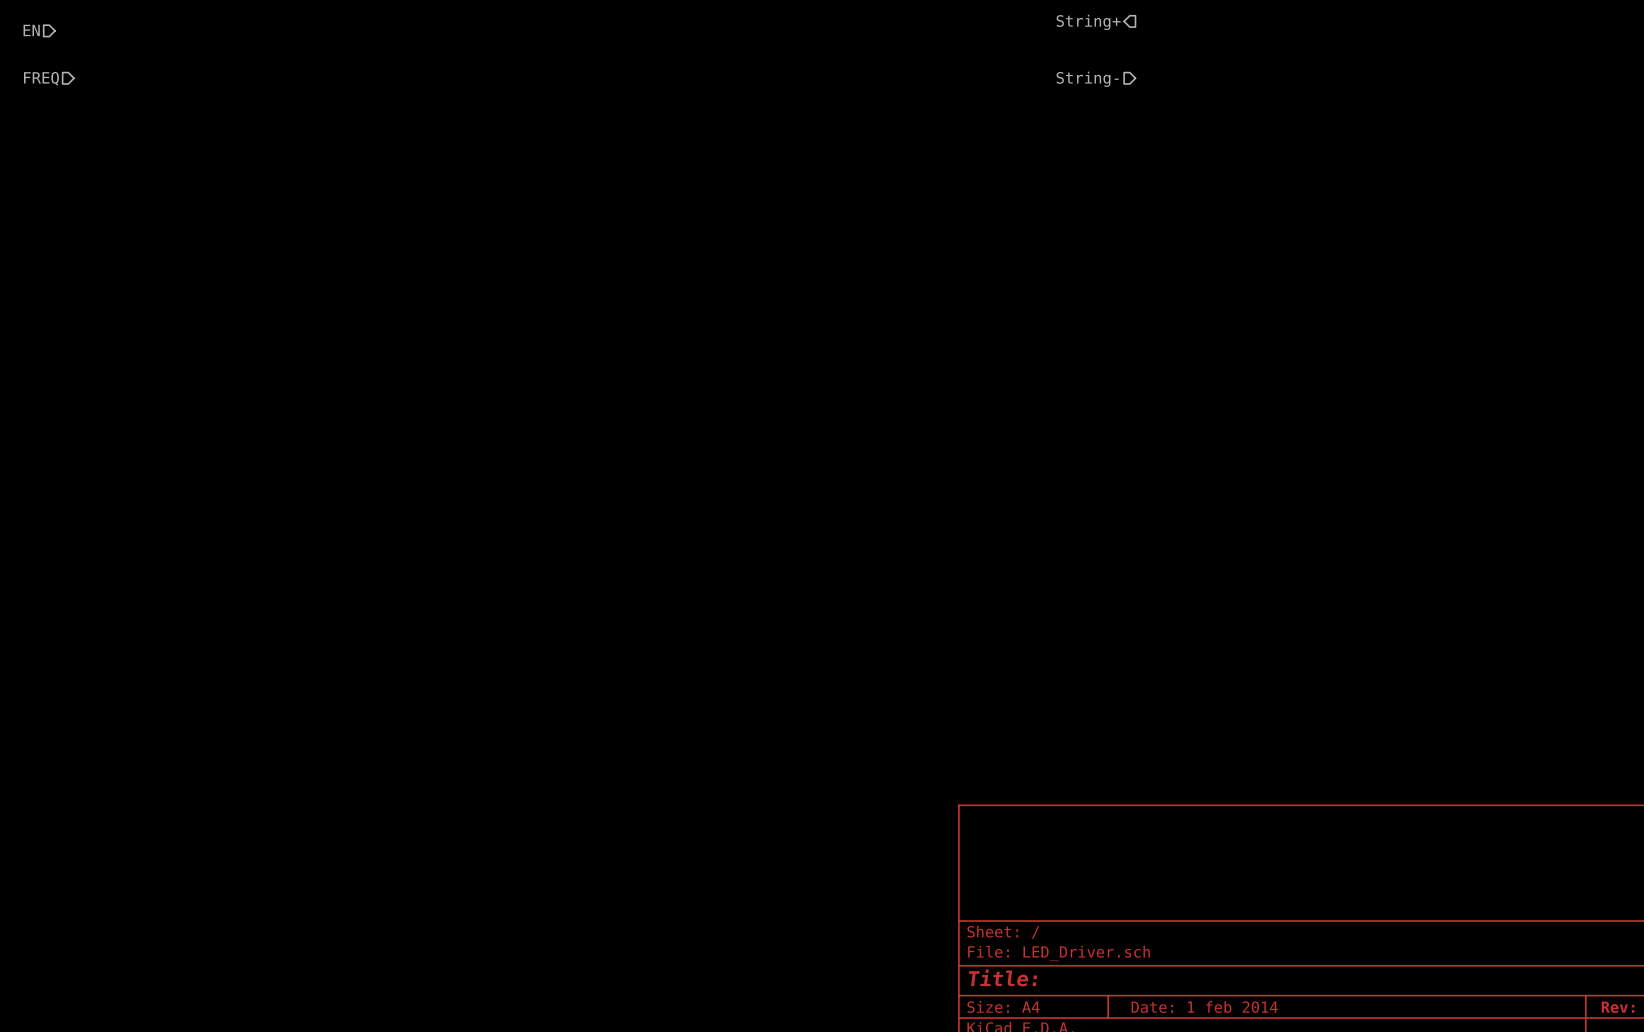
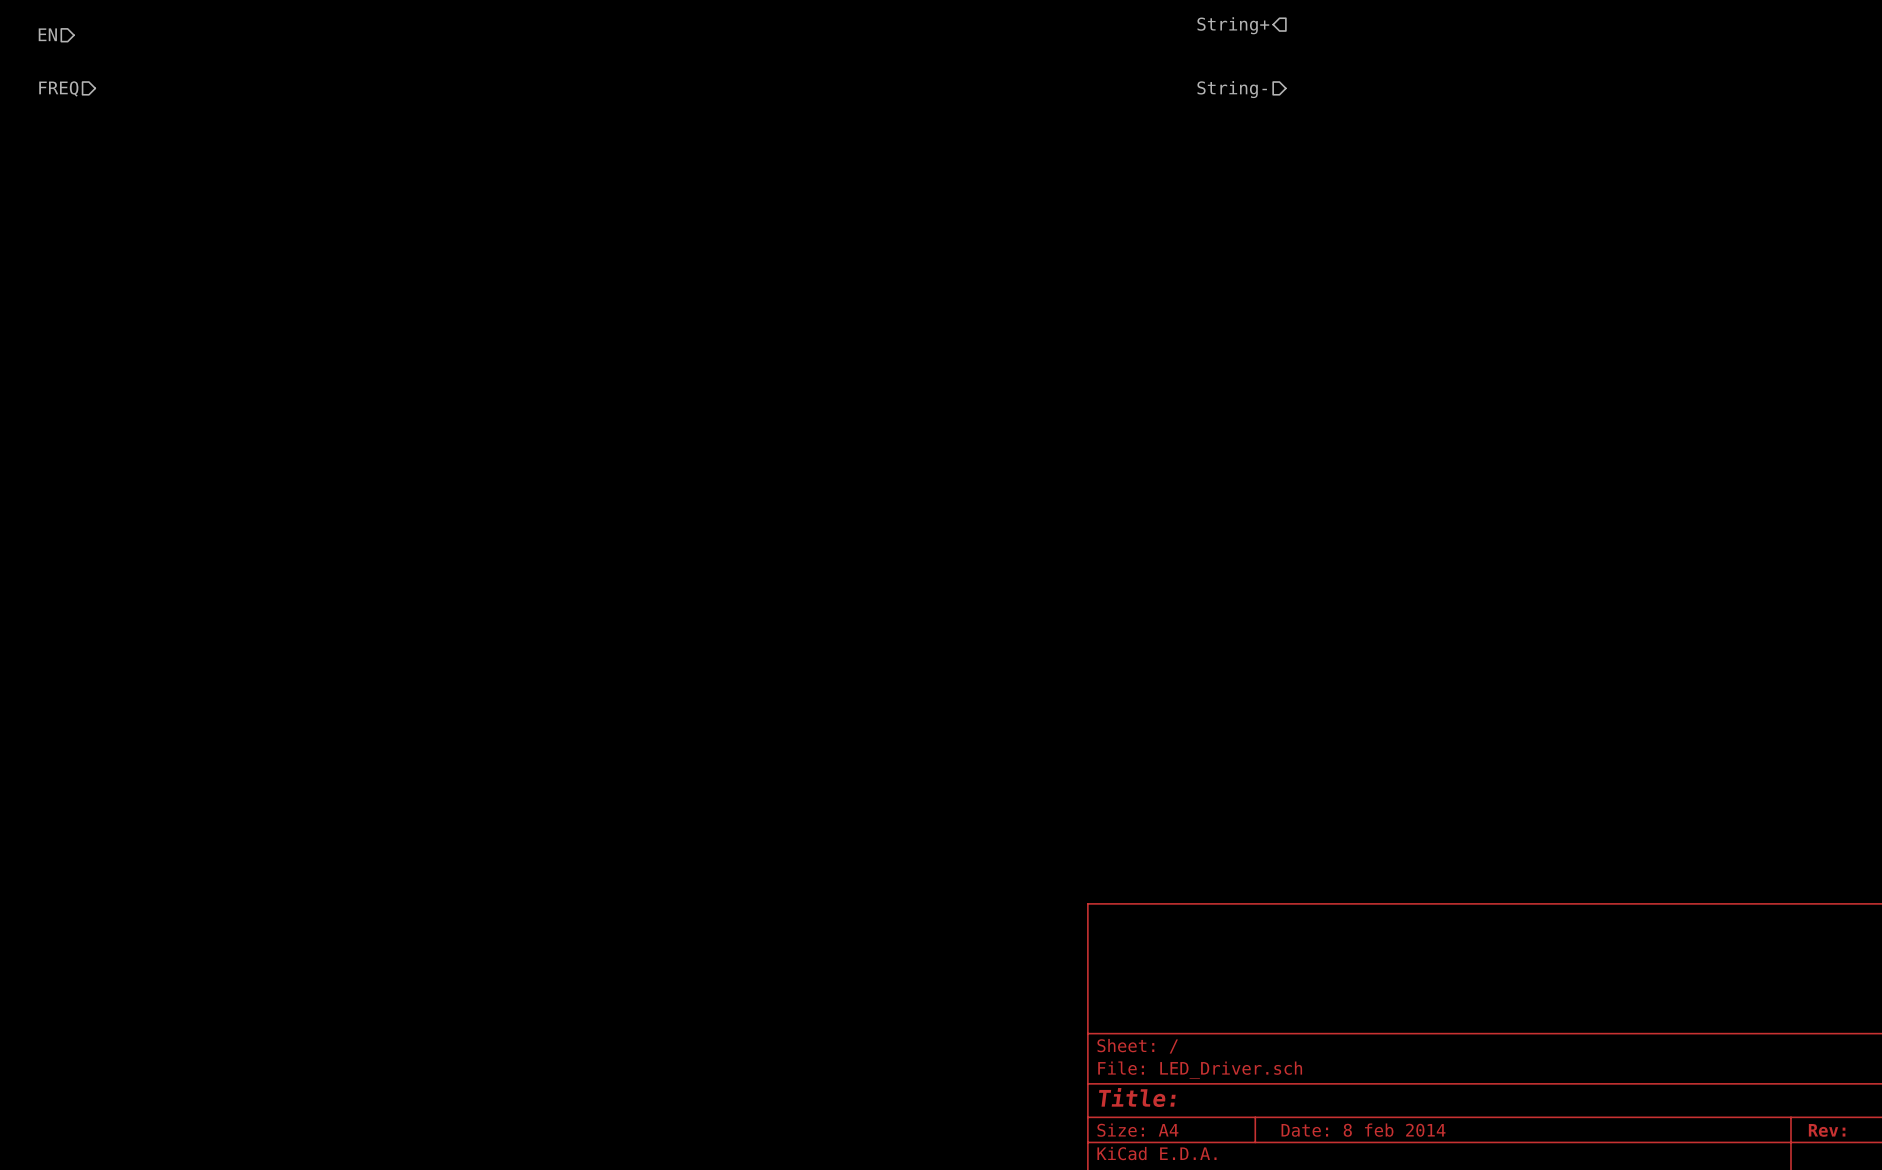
title block: Date: 1 feb 2014 (1204, 1007) -> Date: 8 feb 2014 (1363, 1130)

